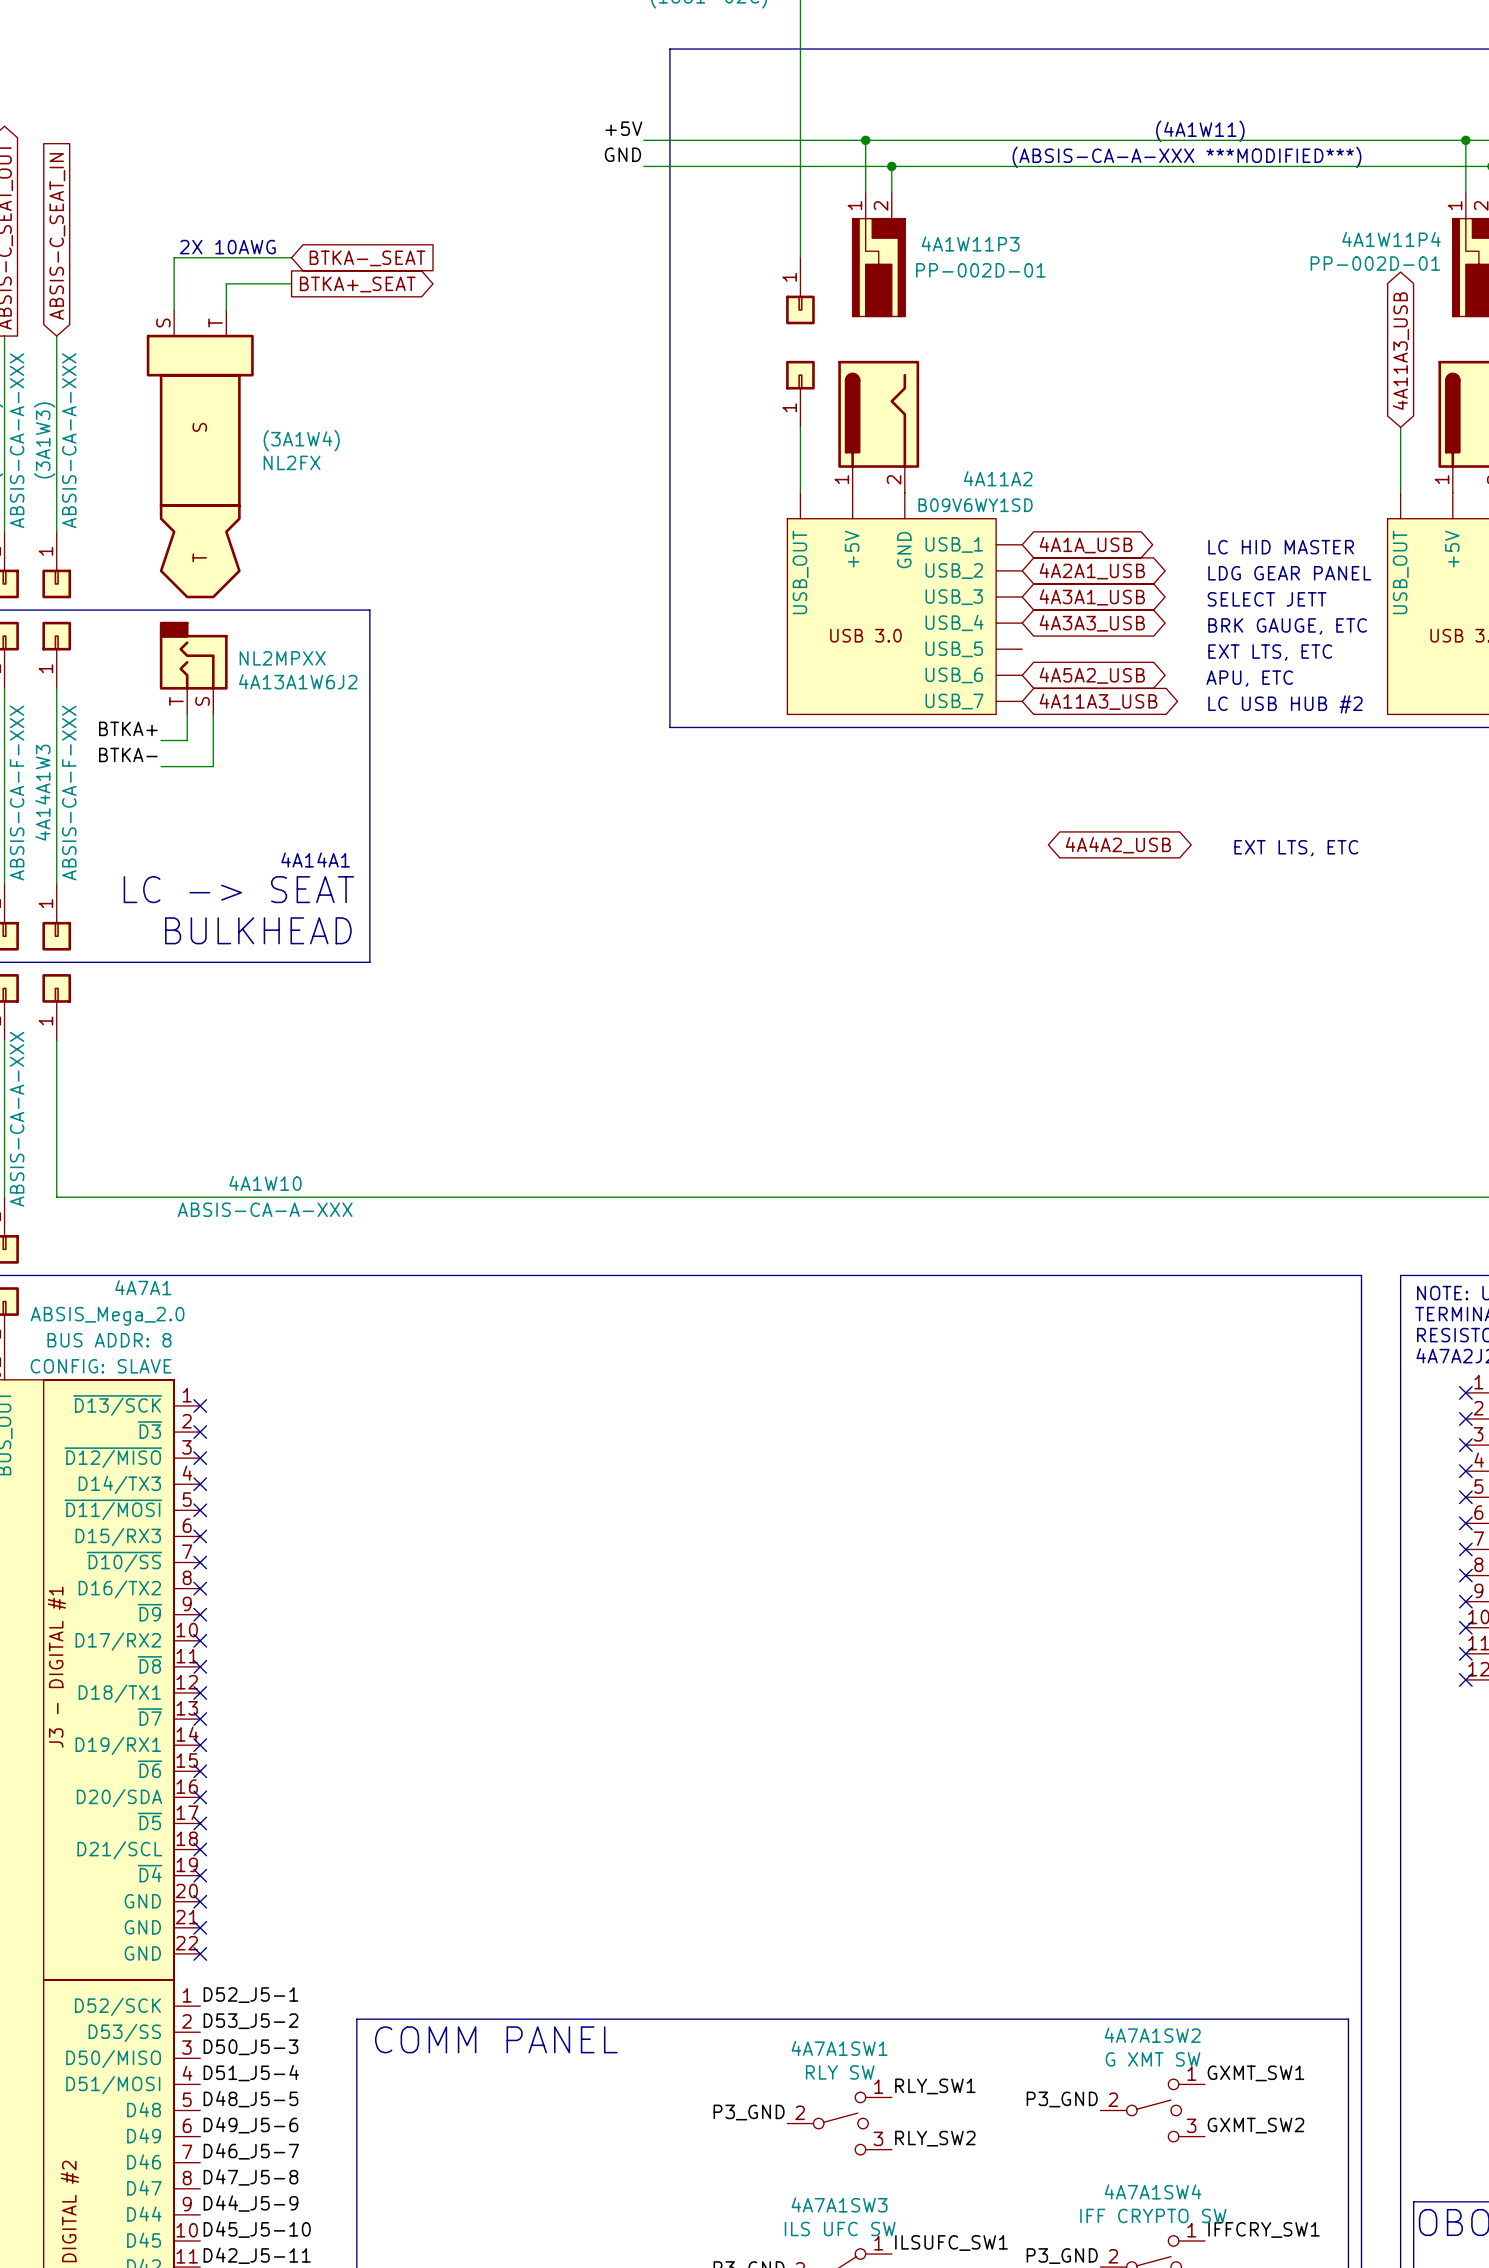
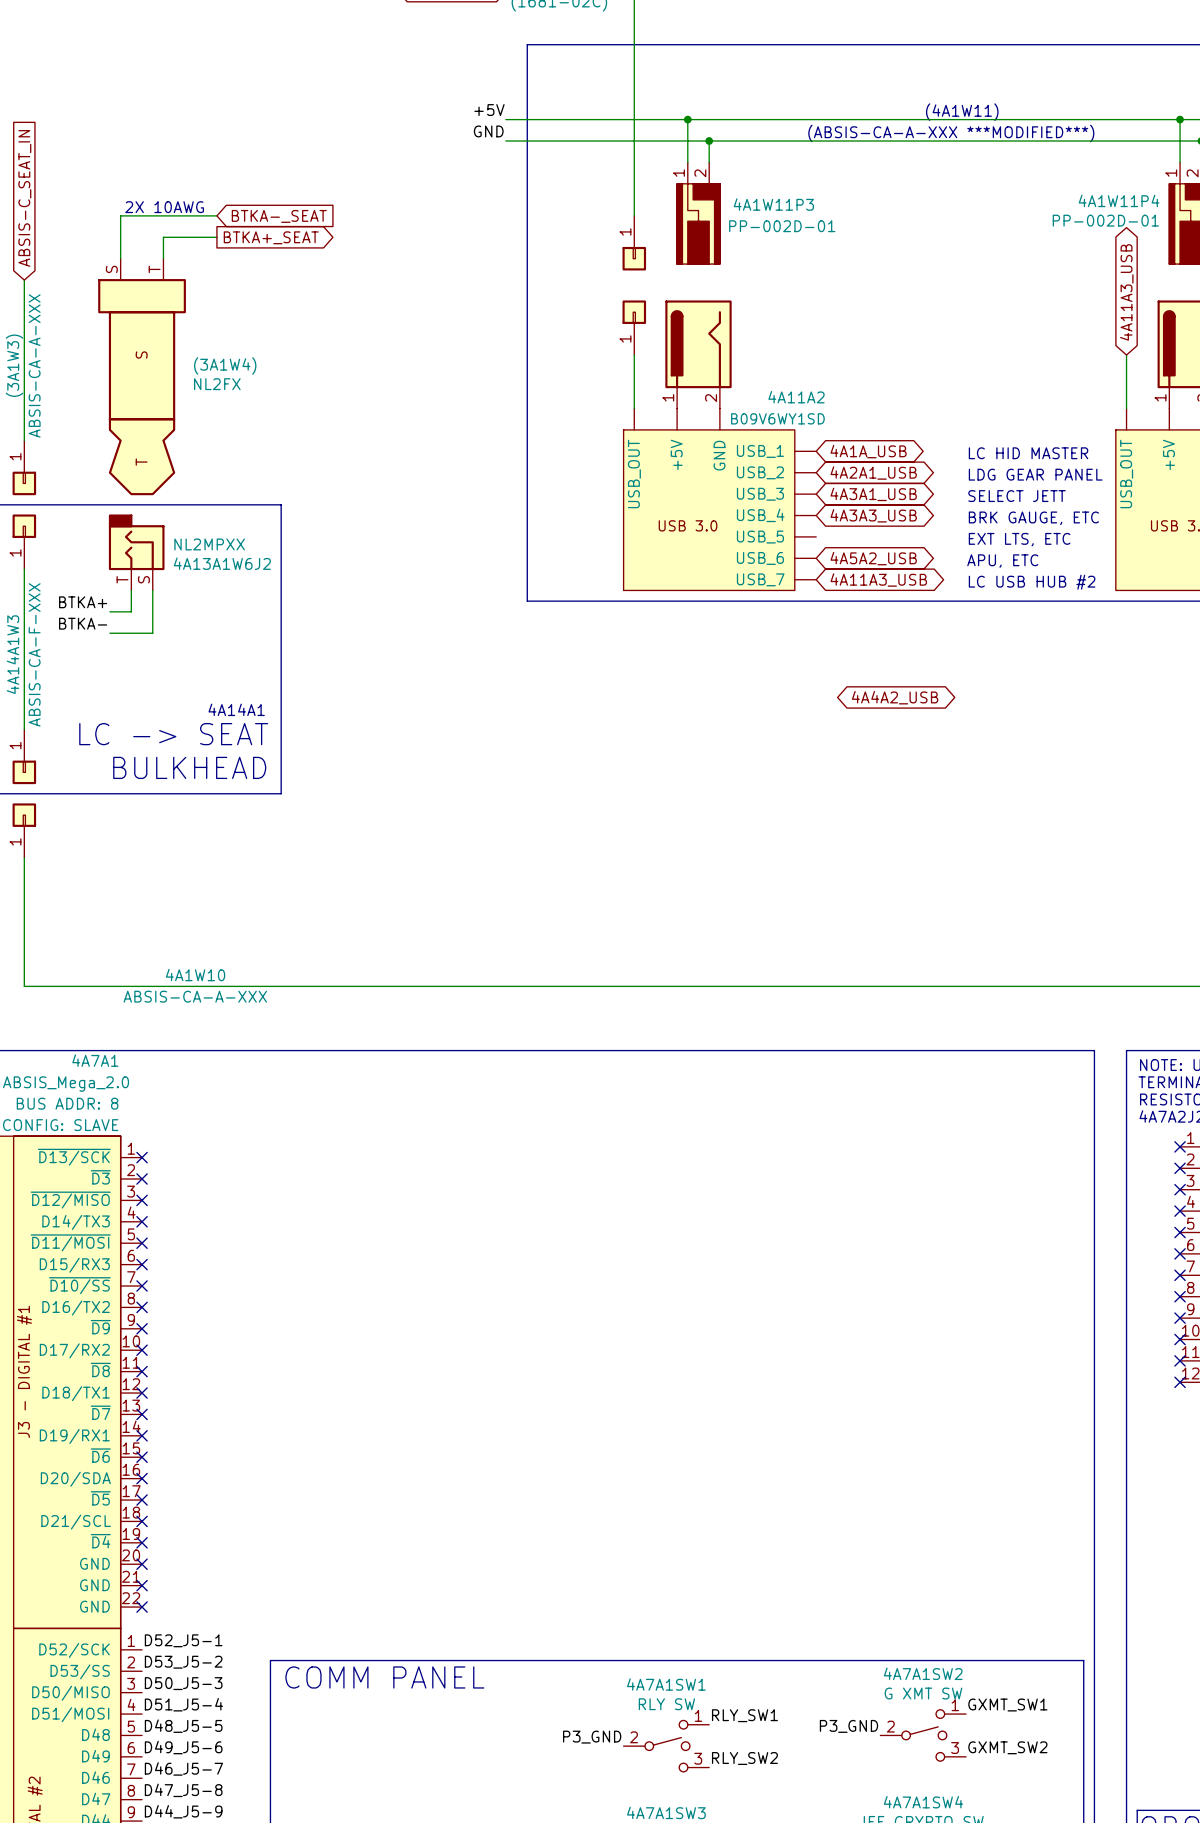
text: EXT LTS, ETC (1296, 848) -> none

